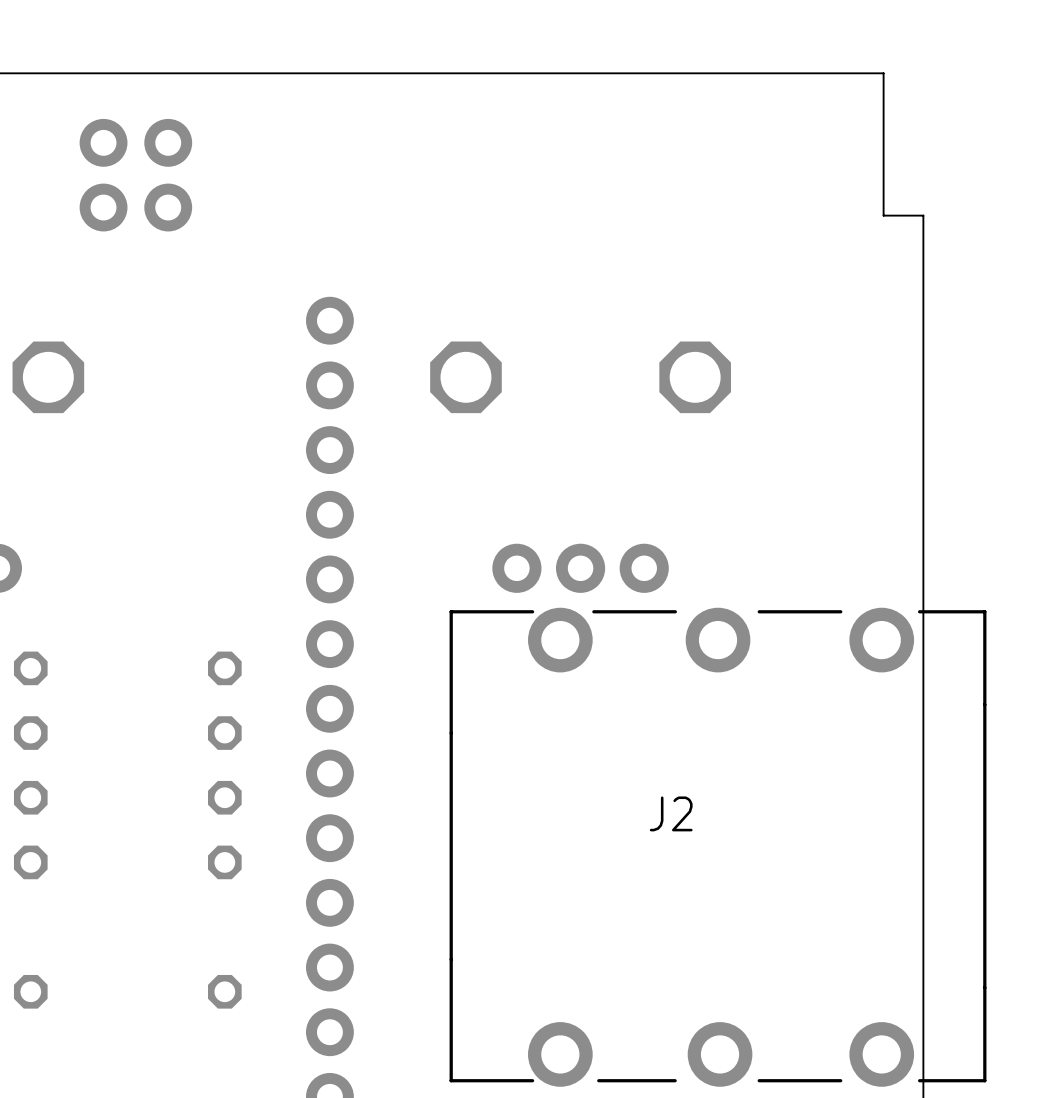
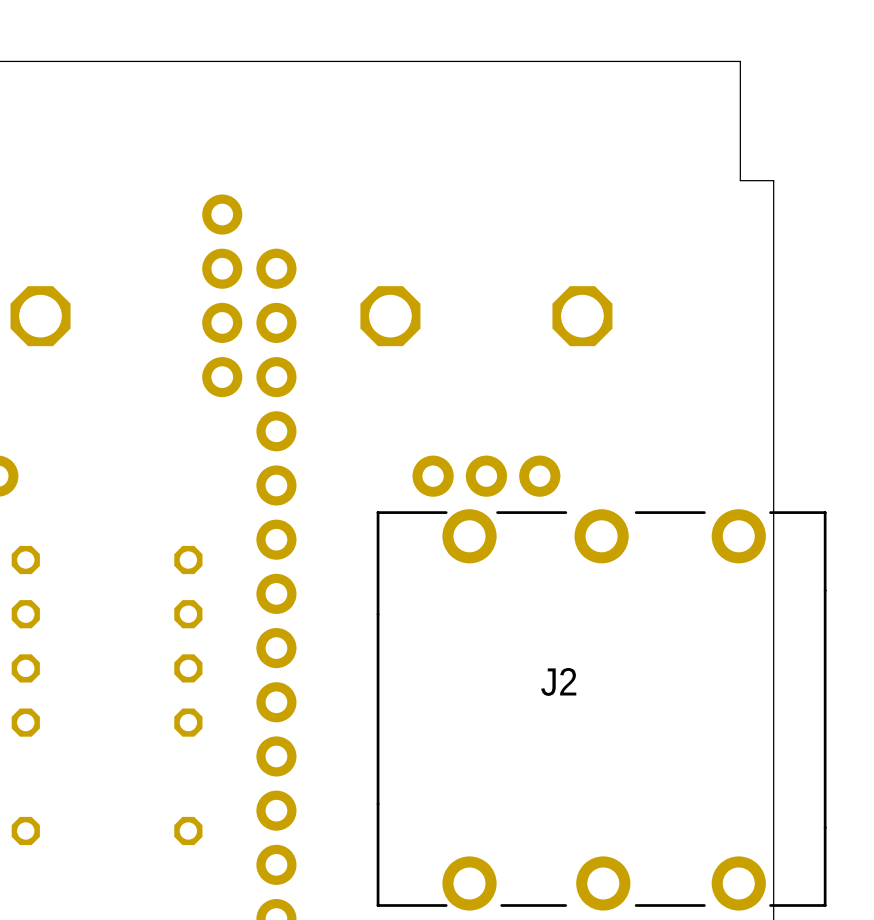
part: (135, 142) -> none
part: (135, 207) -> none
part: none -> (222, 241)
part: none -> (222, 350)

